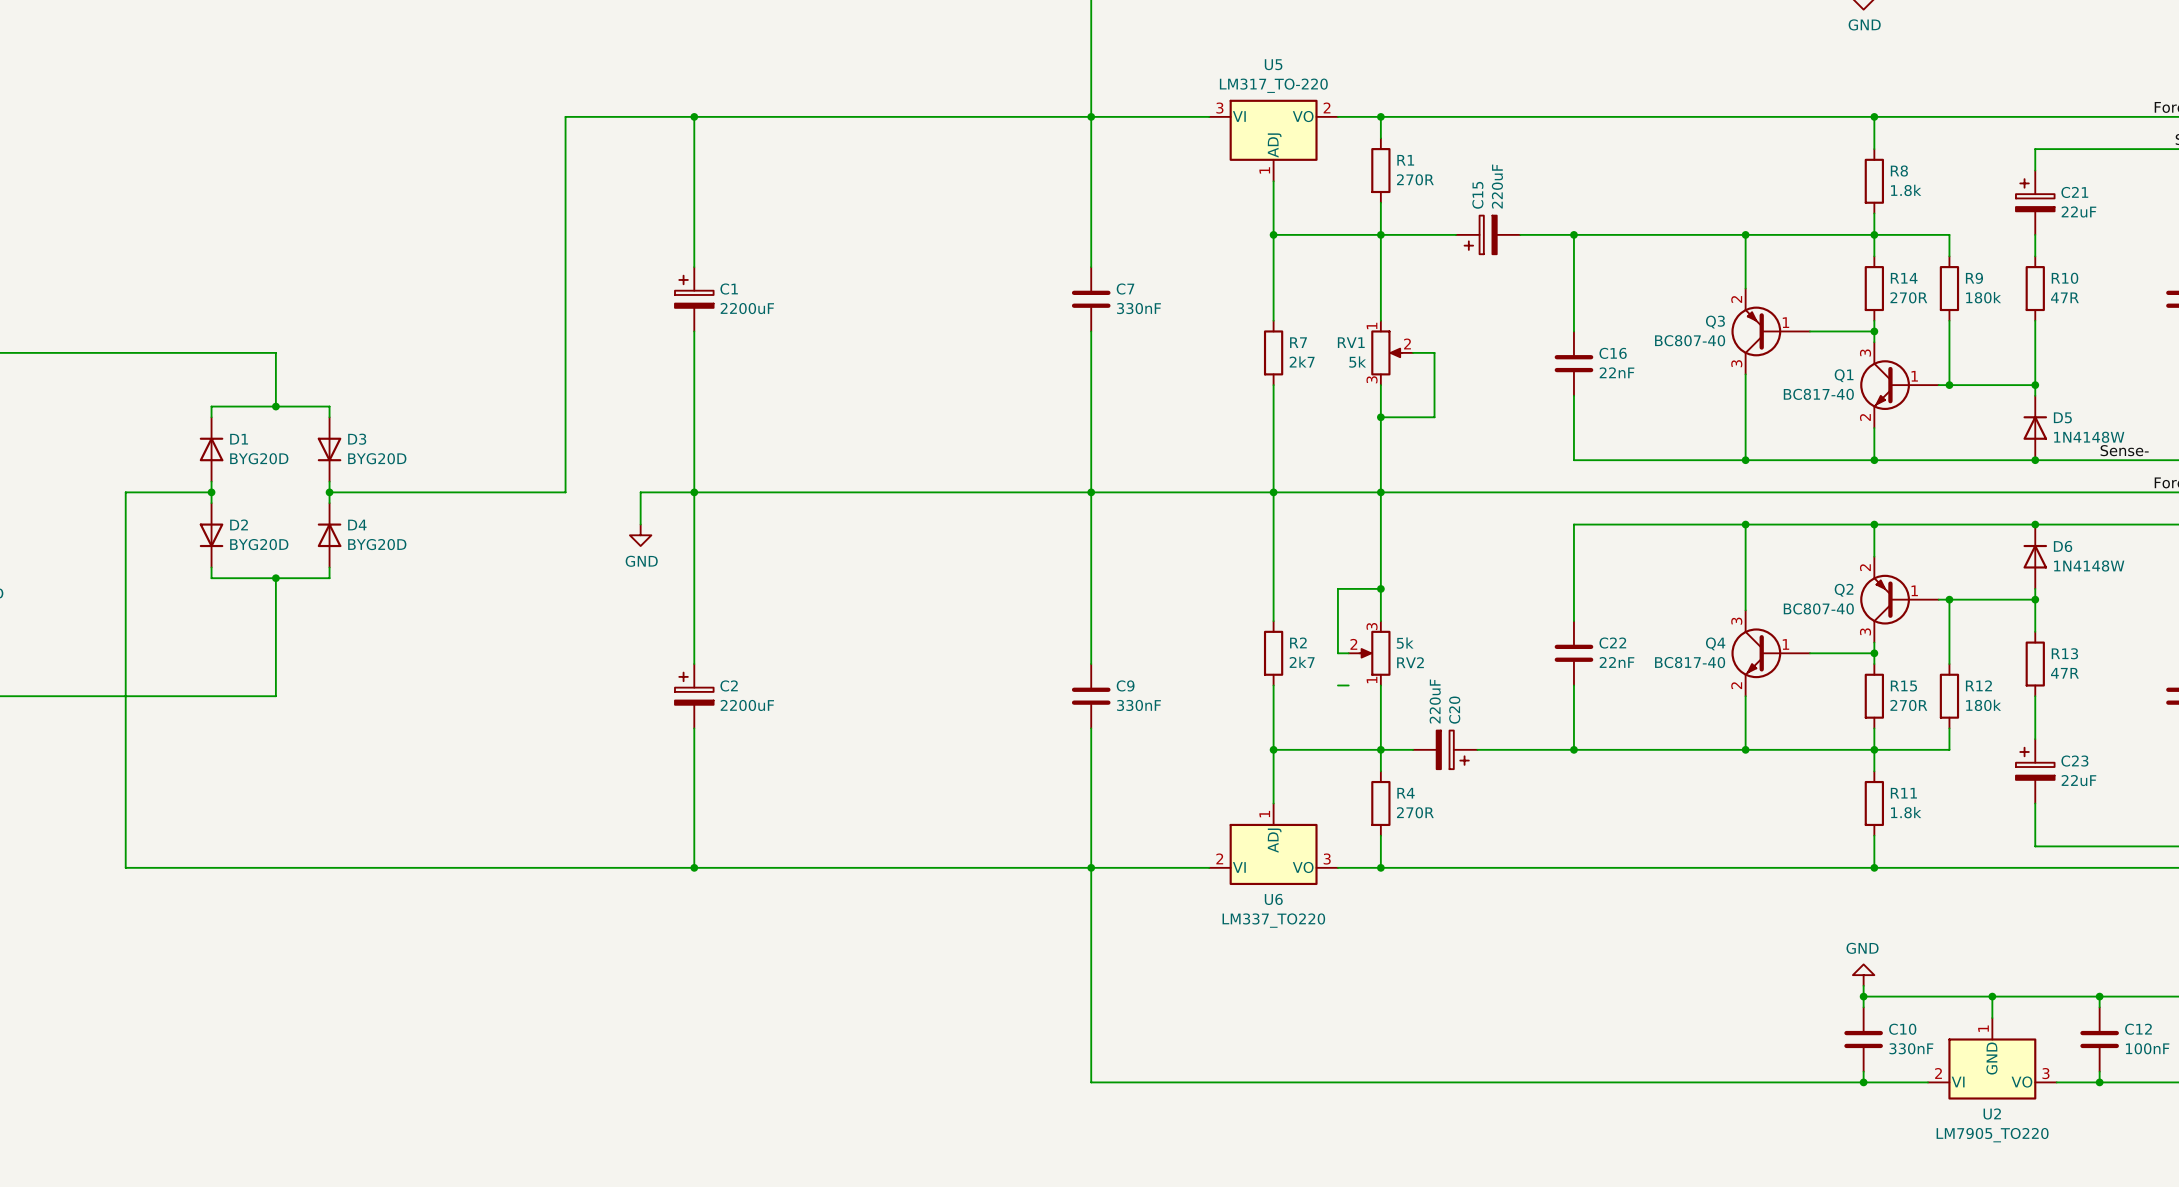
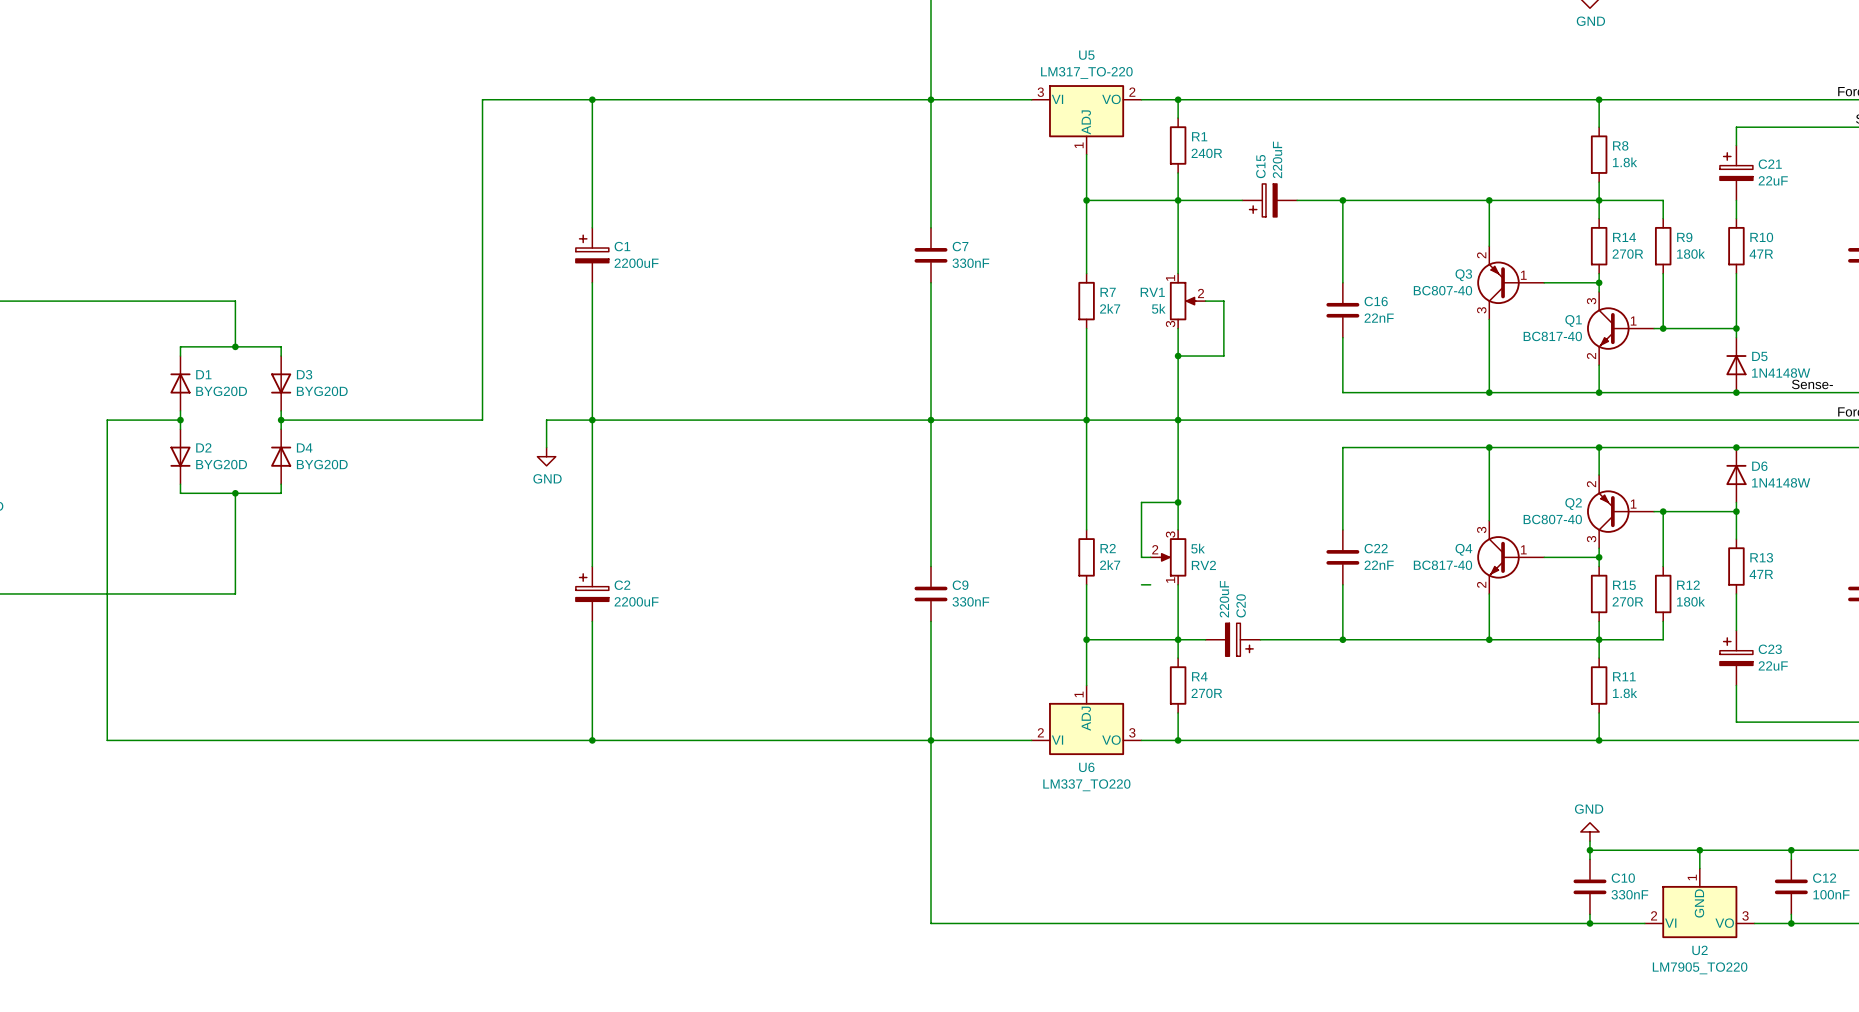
R1 value: 270R (1415, 179) -> 240R (1206, 153)

